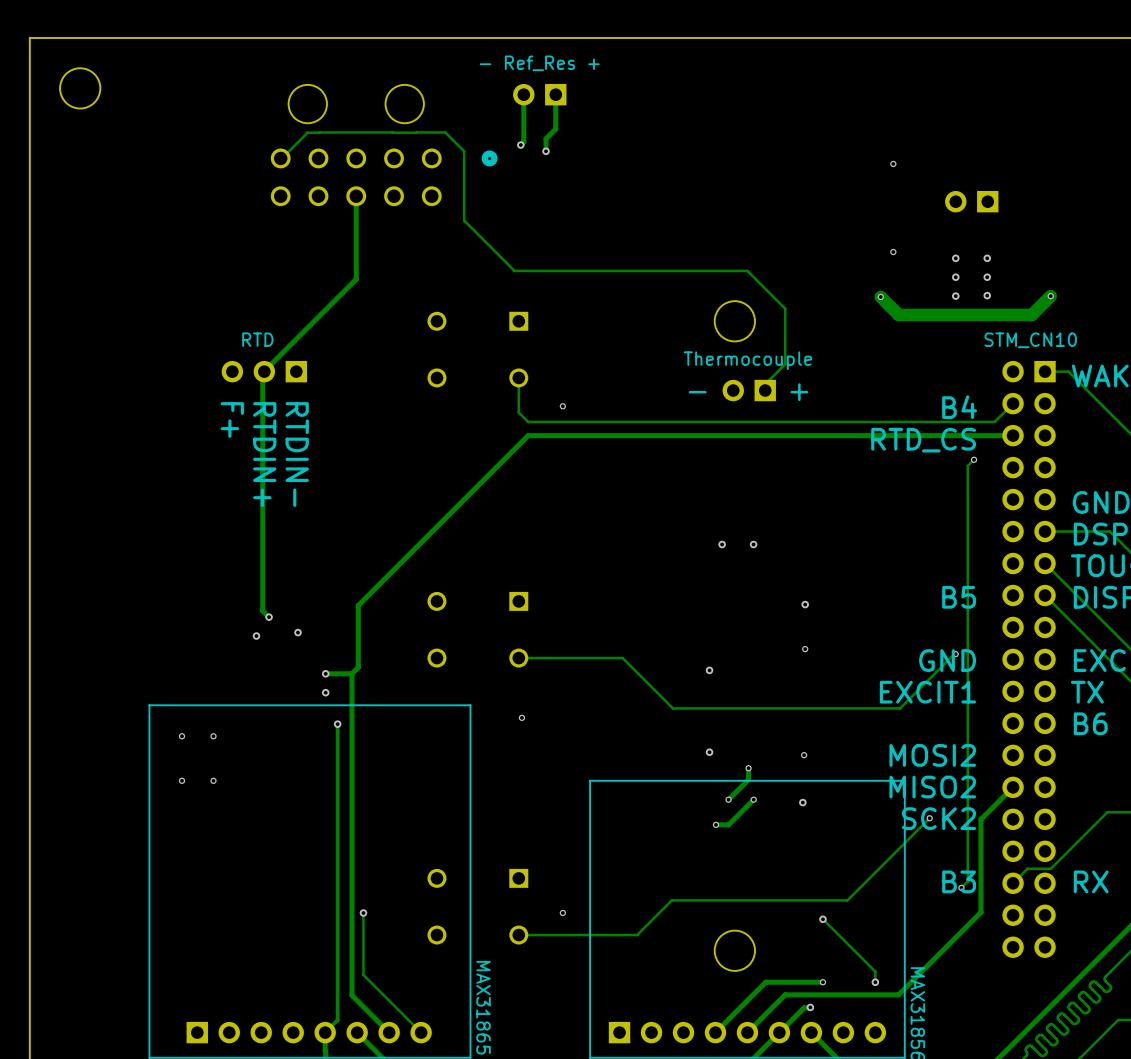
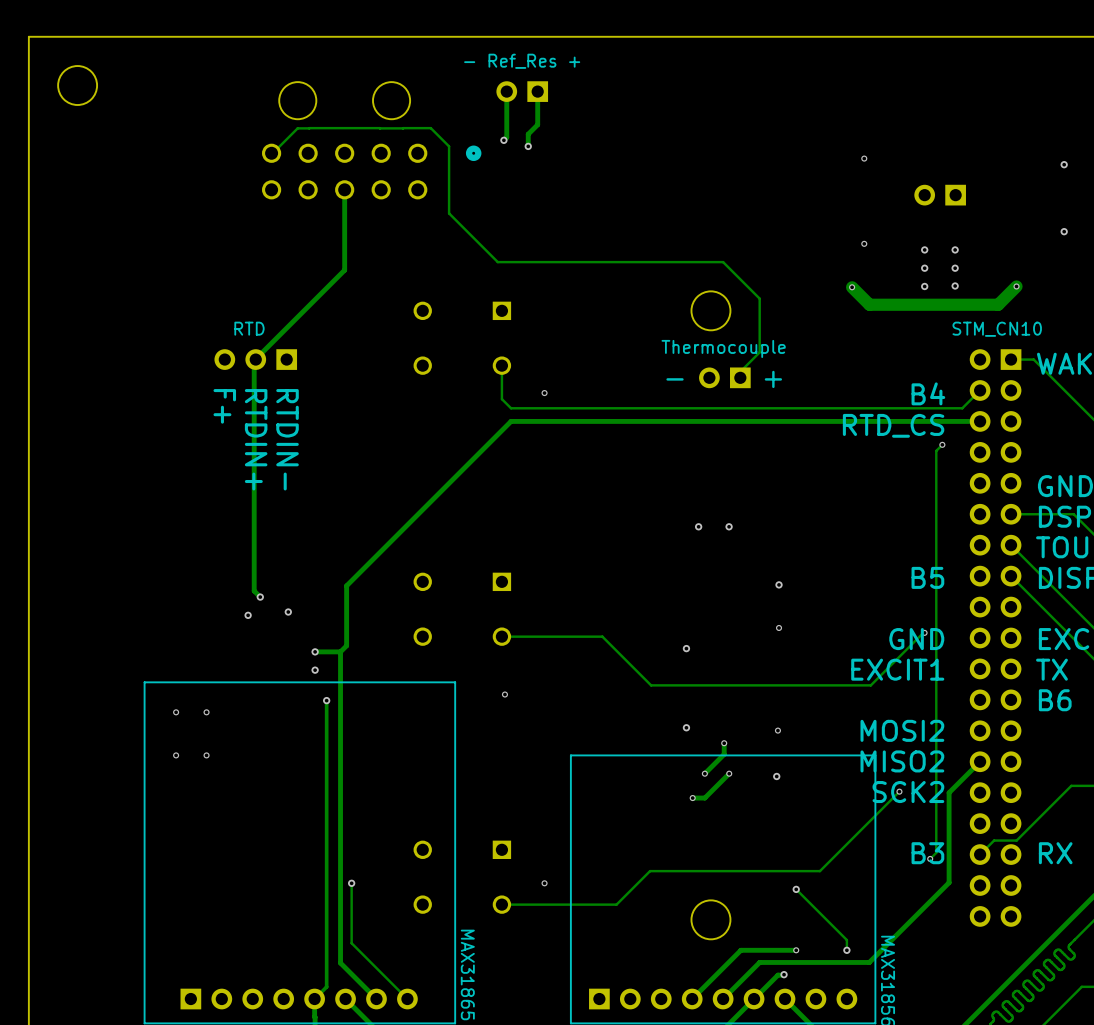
via: none -> (1064, 164)
via: none -> (1064, 231)

